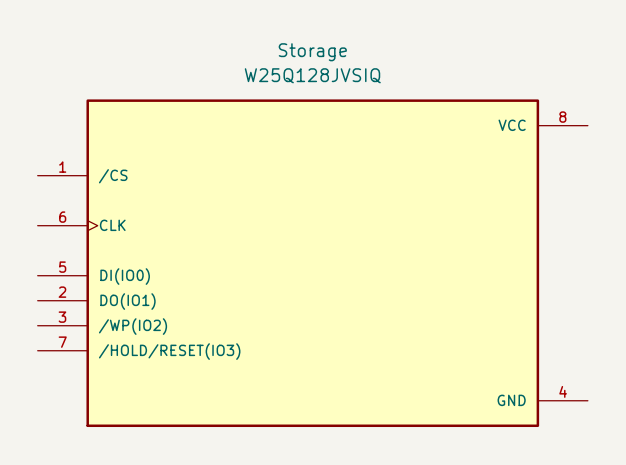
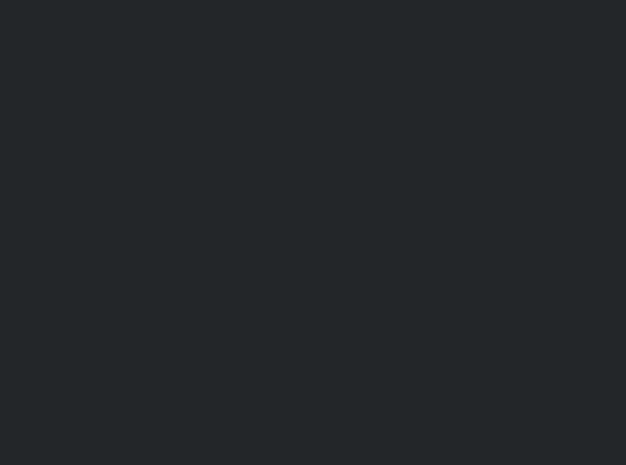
Storage: W25Q128JVSIQ (312, 263) -> none

